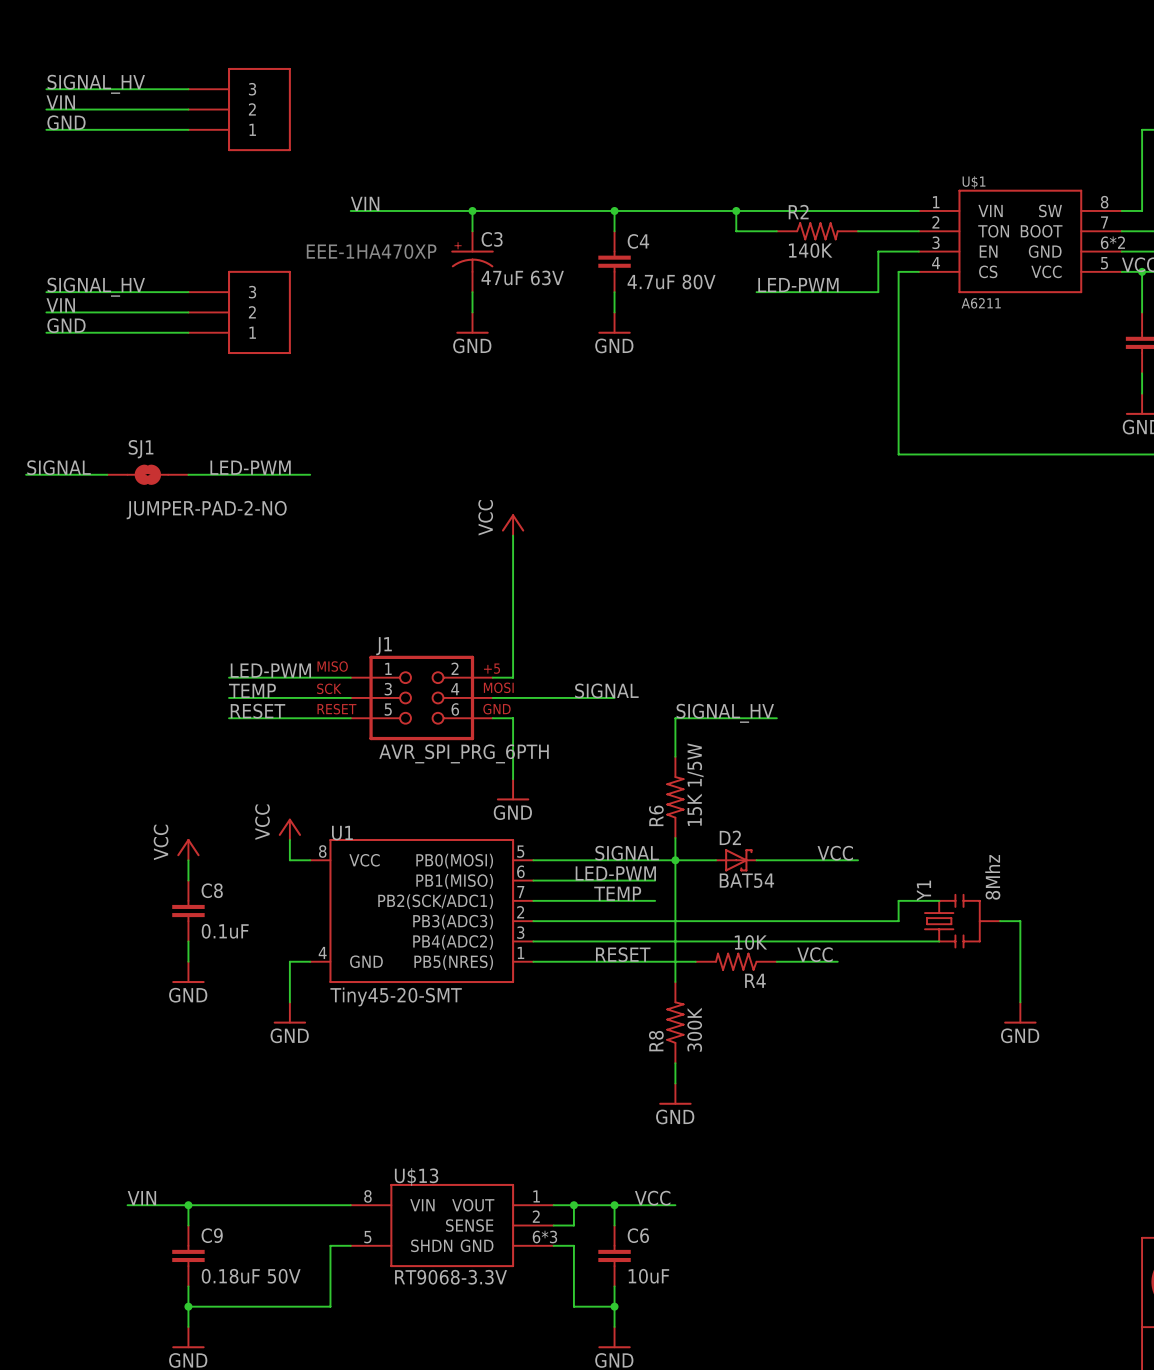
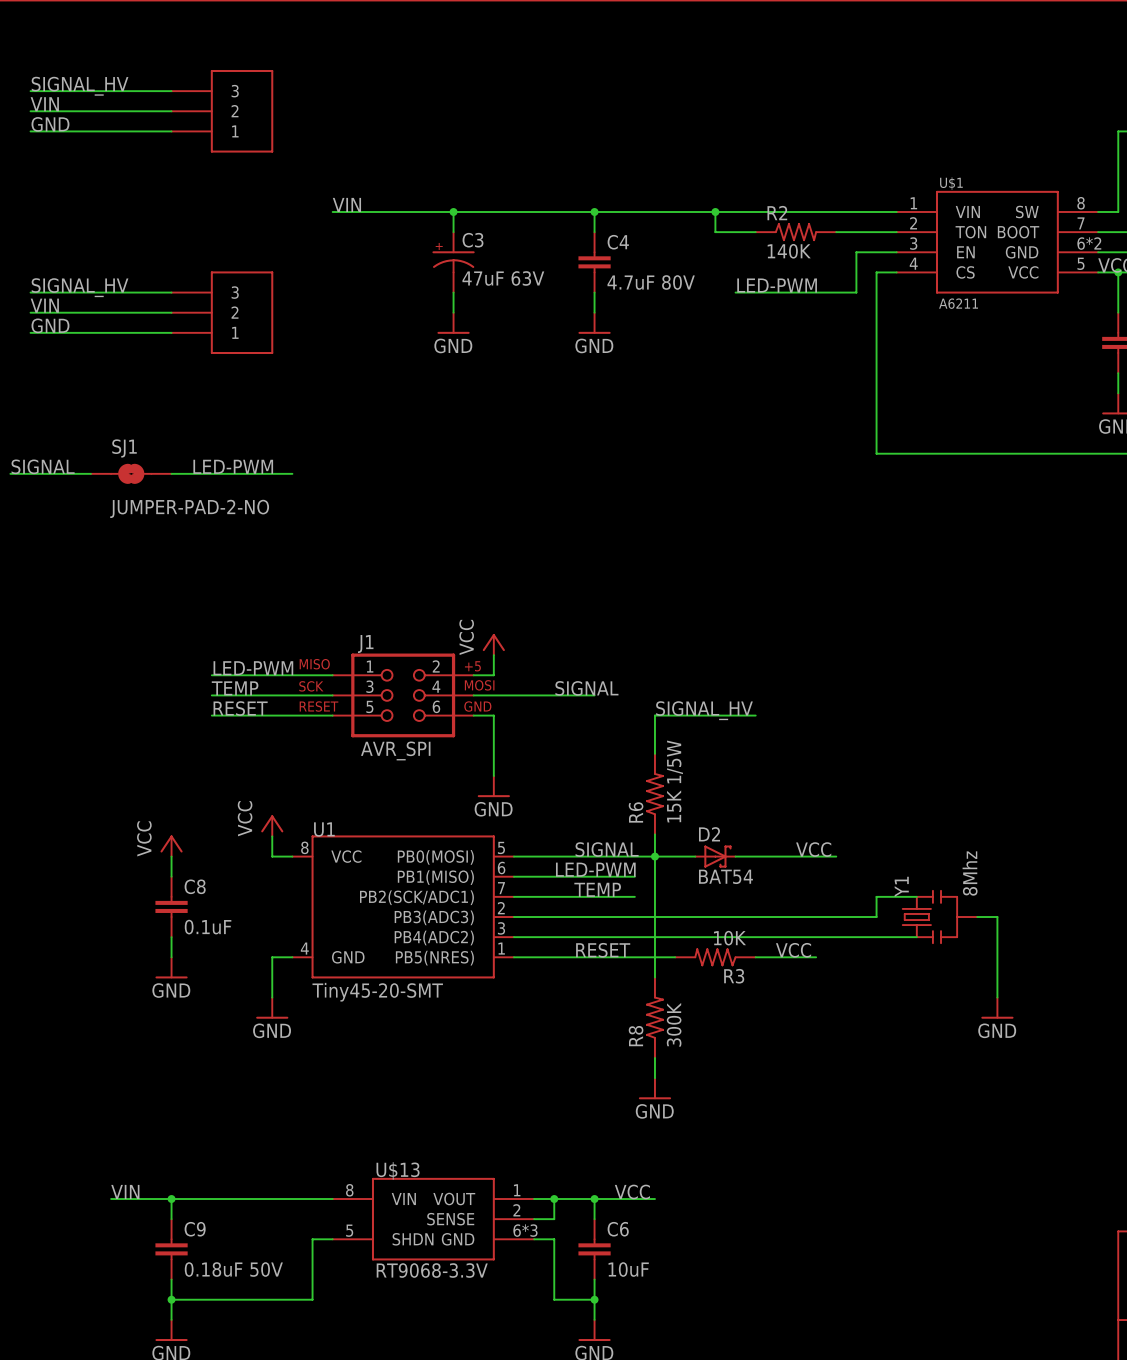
text: EEE-1HA470XP (371, 251) -> none
power symbol position: VCC (513, 524) -> VCC (493, 644)
wire: (513, 535) (513, 657) -> none
J1 value: AVR_SPI_PRG_6PTH (464, 753) -> AVR_SPI (395, 750)
R4 name: R4 (755, 980) -> R3 (734, 976)

